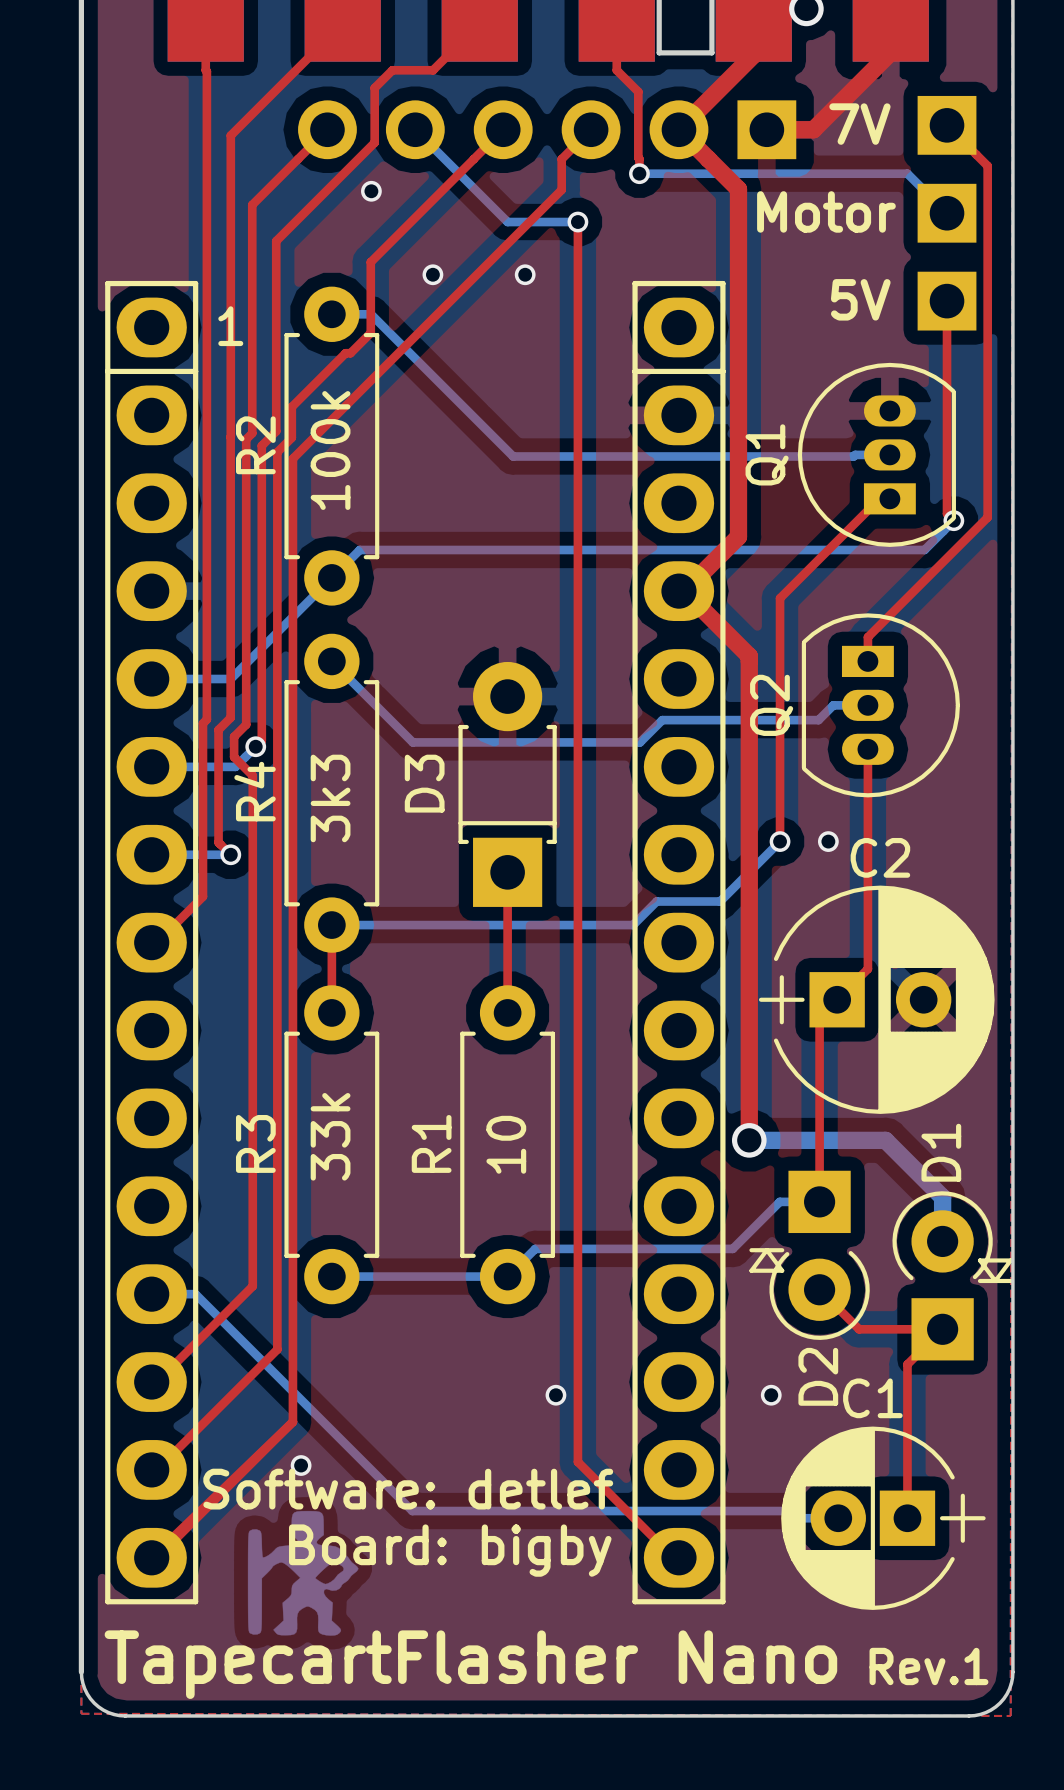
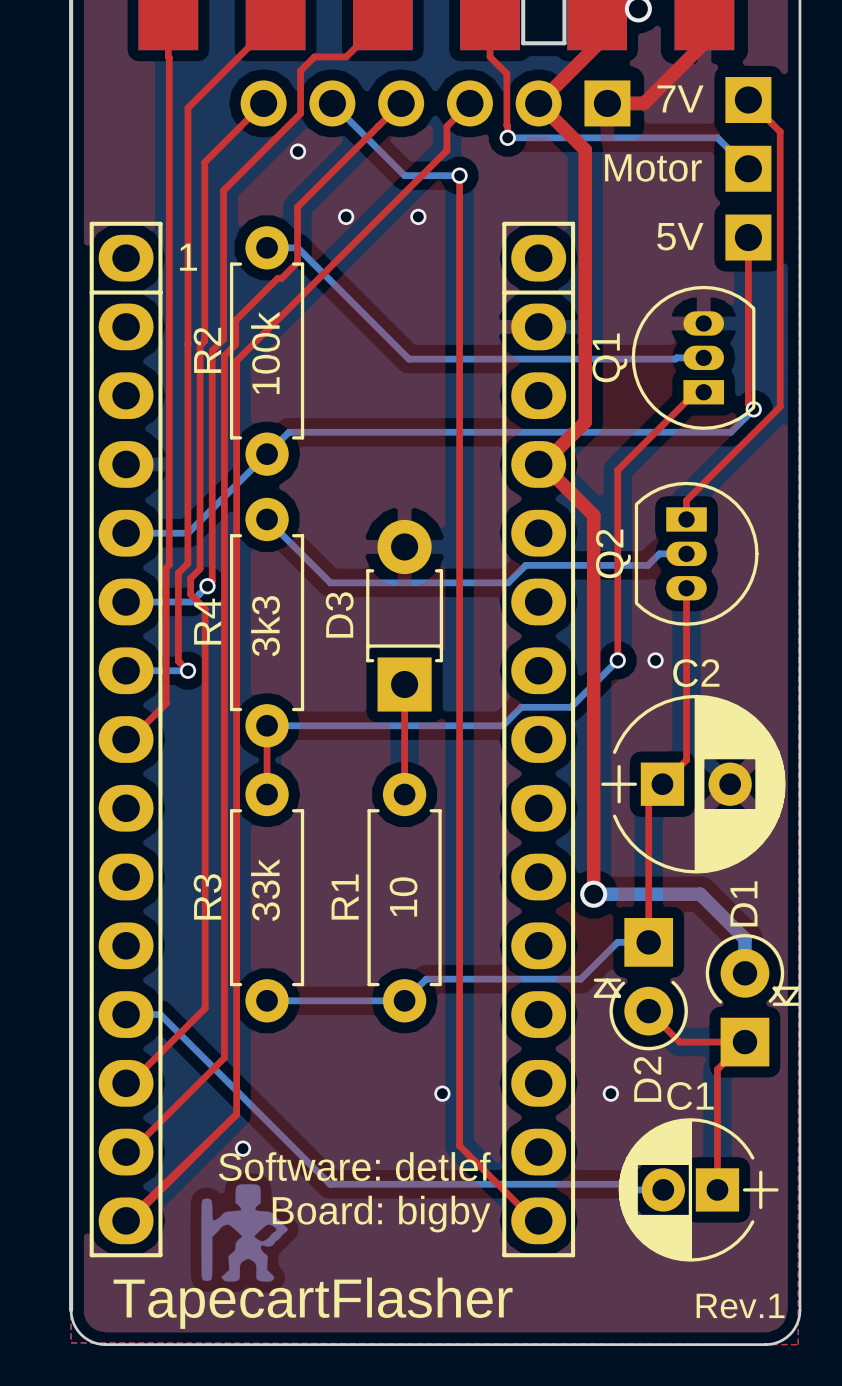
text: TapecartFlasher Nano (470, 1664) -> TapecartFlasher (313, 1303)

